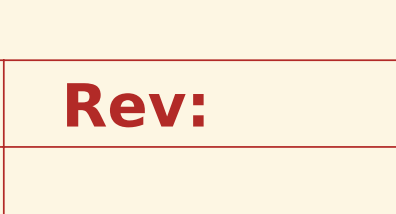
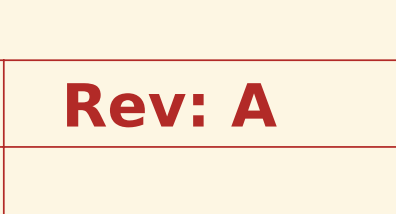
title block: Rev: (135, 105) -> Rev: A (171, 105)

